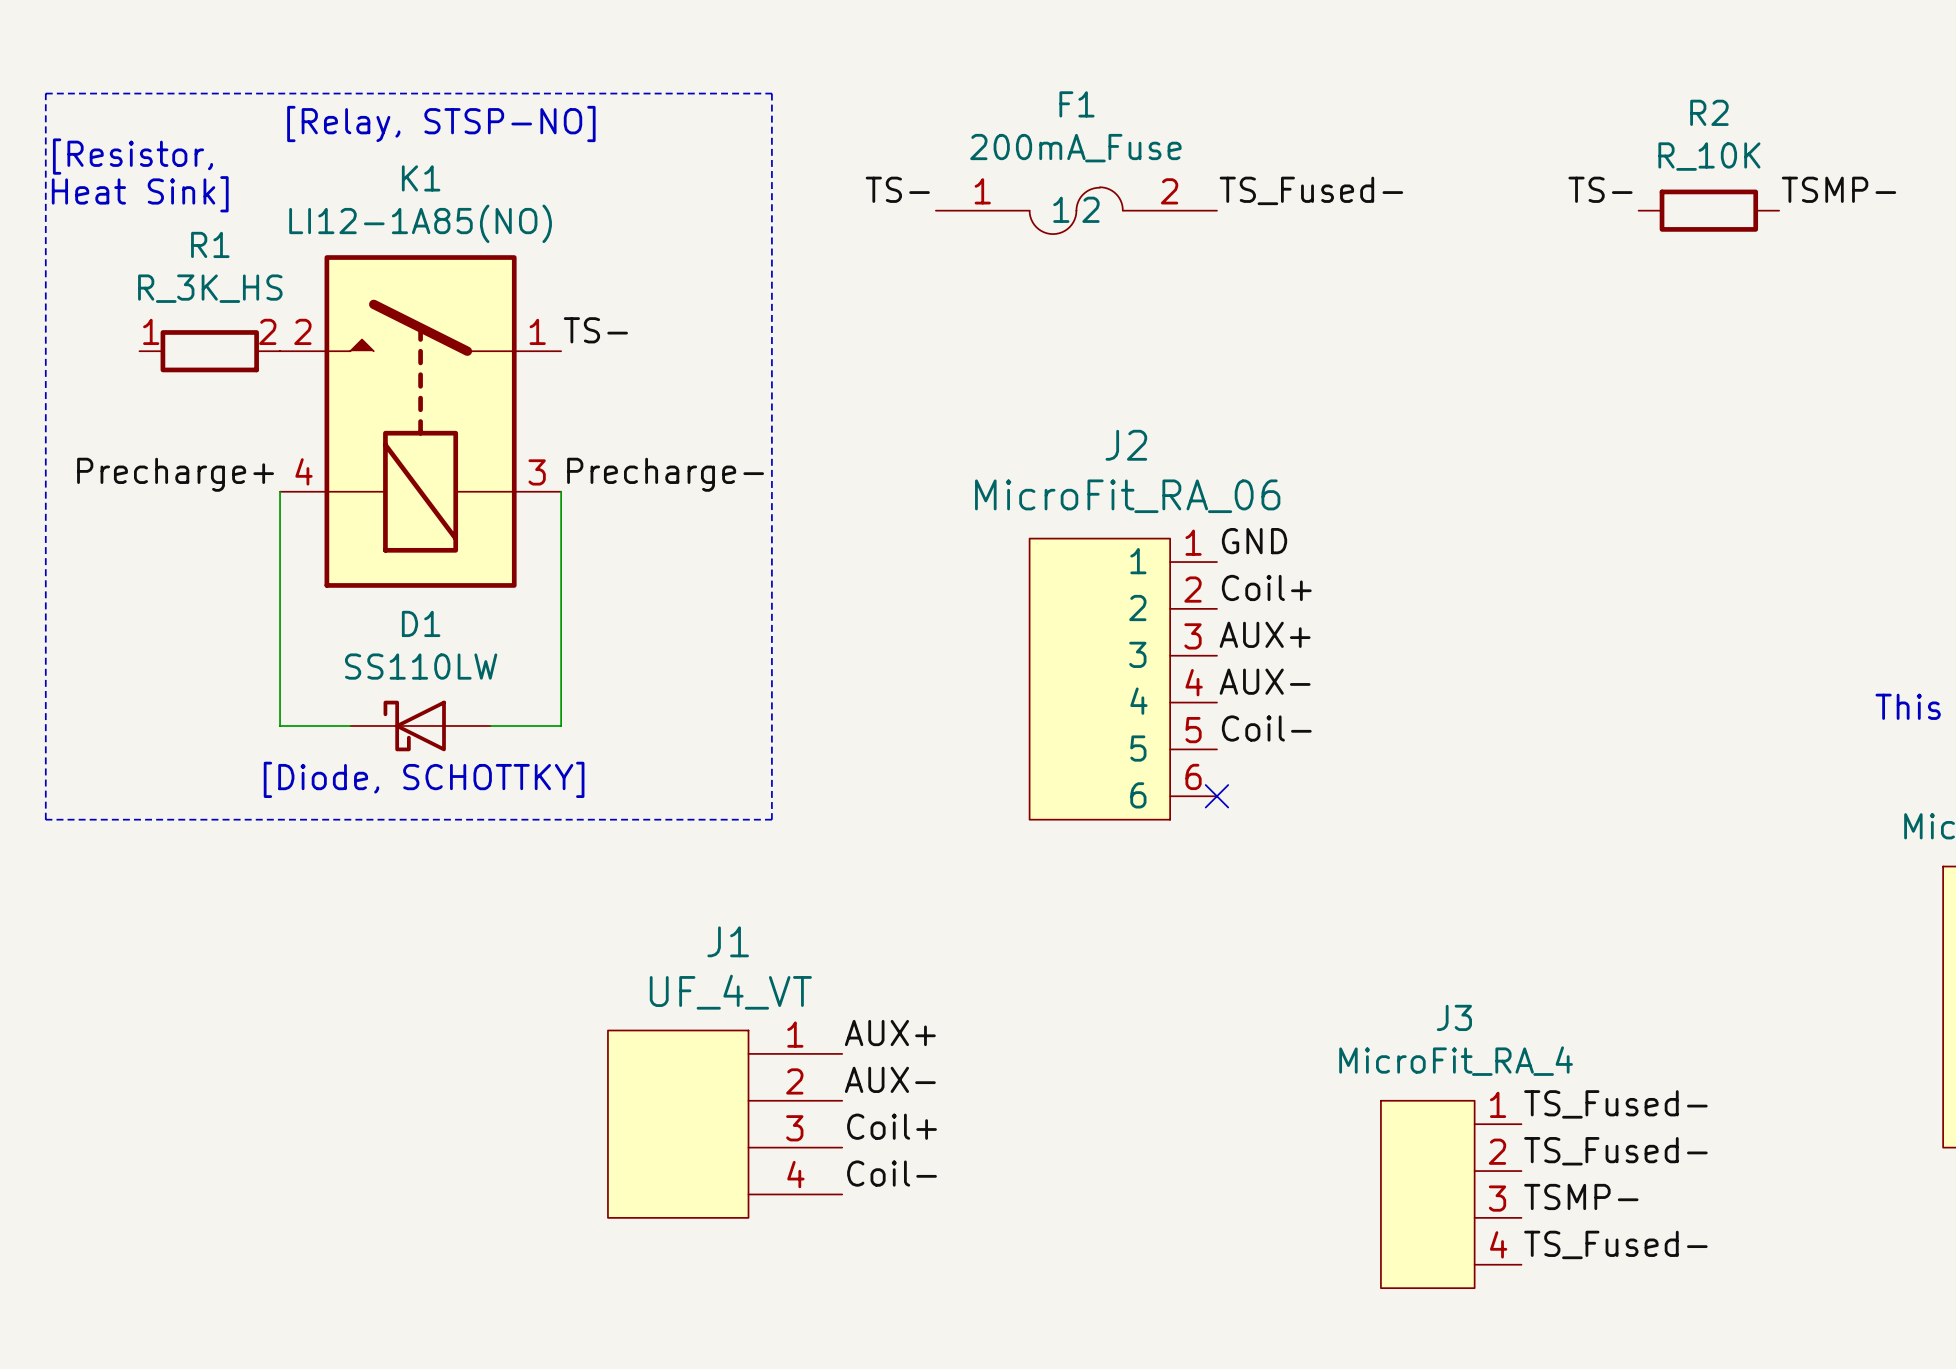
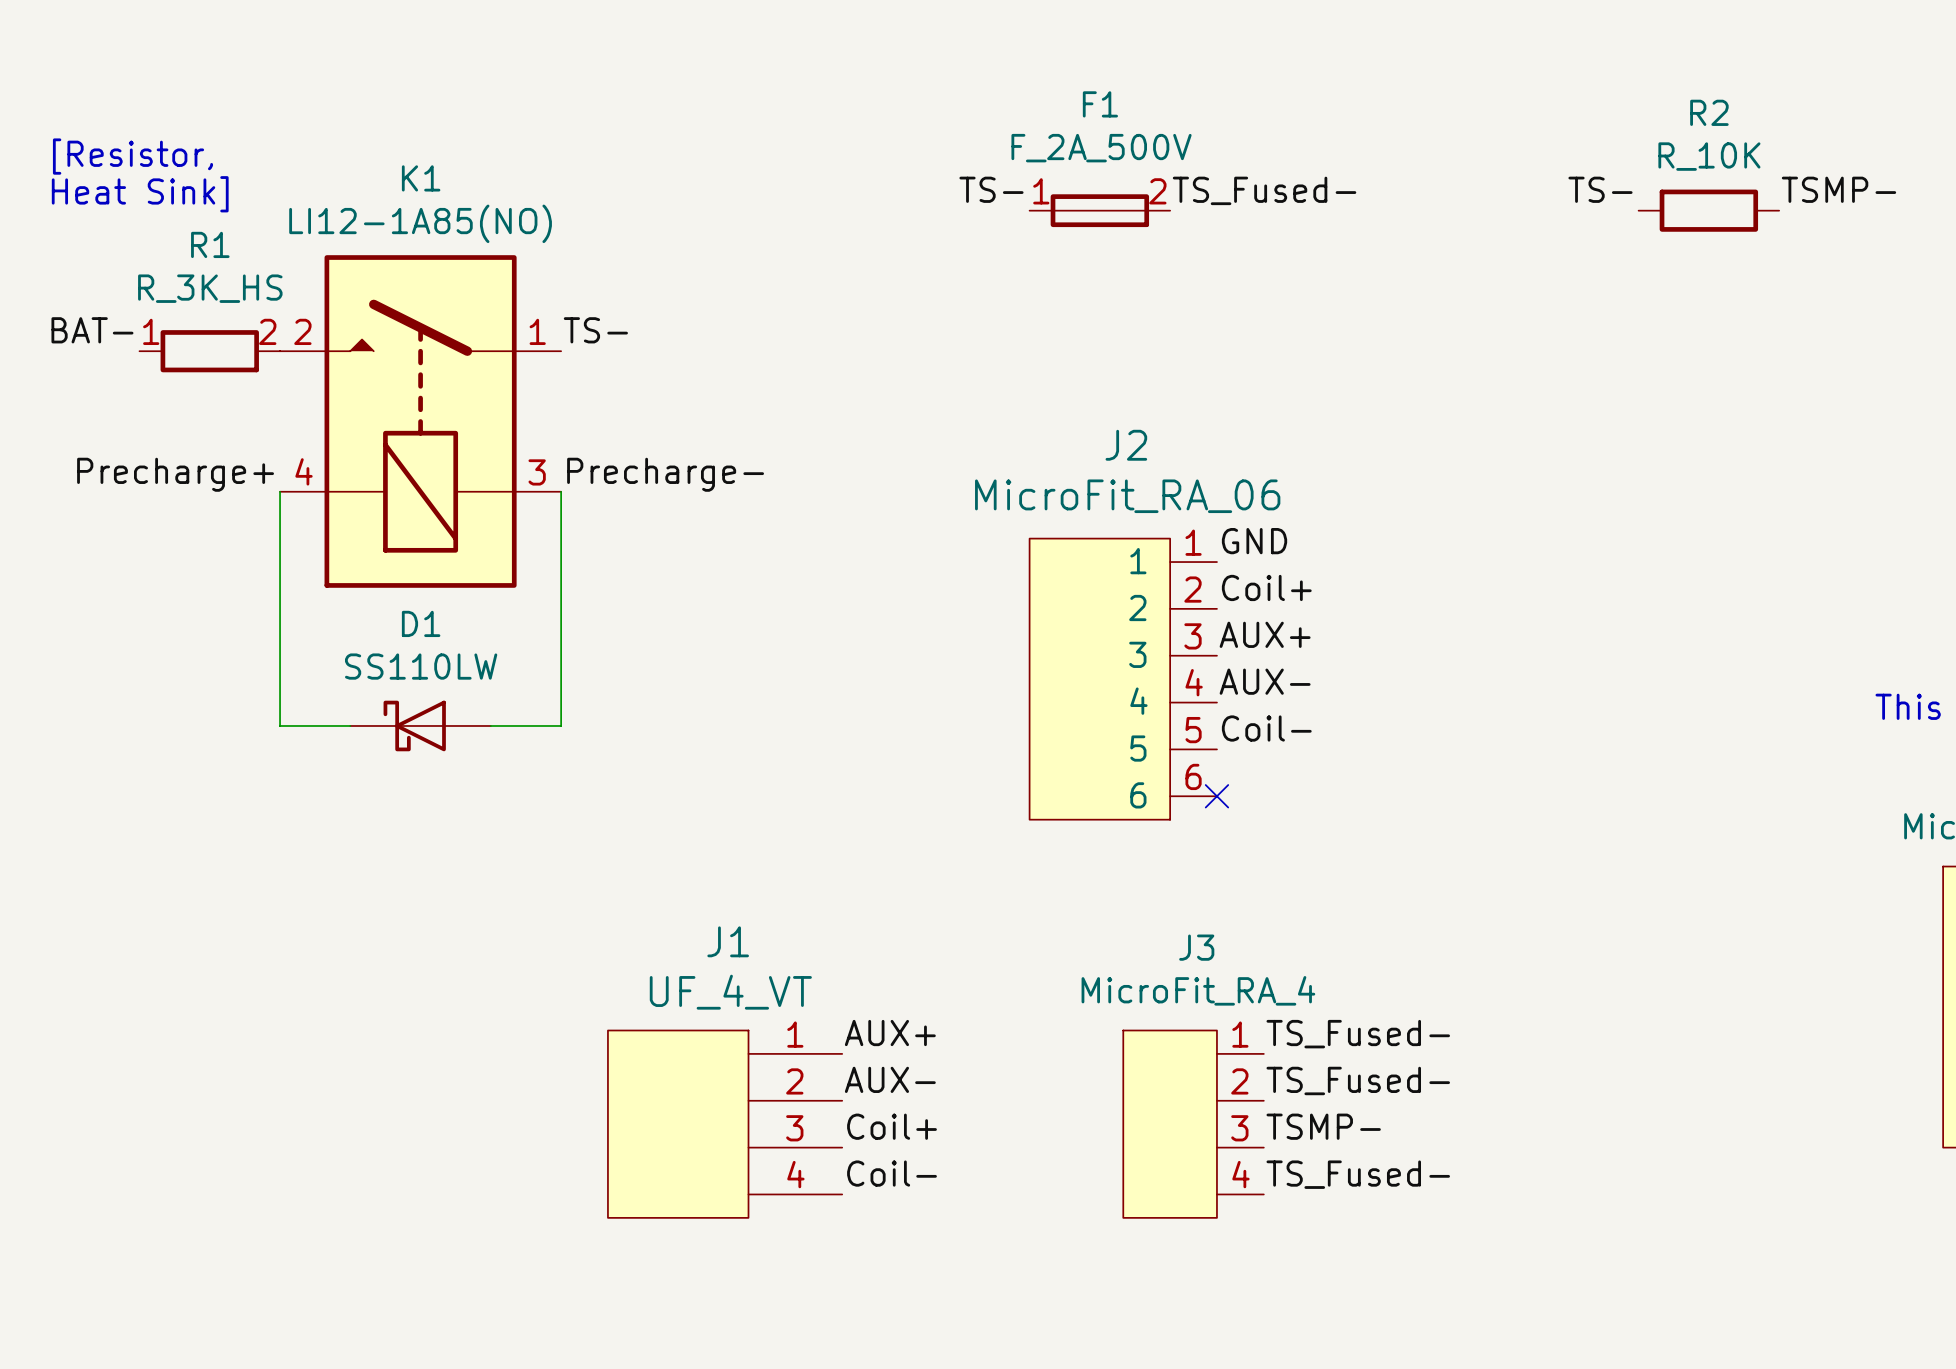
line: (45, 93) (45, 819) (771, 819) (771, 93) (45, 93) -> none
text: [Relay, STSP-NO] (441, 124) -> none
F1 value: 200mA_Fuse (1075, 148) -> F_2A_500V (1101, 148)
F1 symbol: [935, 187, 1217, 235] -> [1029, 194, 1171, 228]
label position: TS- (897, 189) -> TS- (991, 189)
label position: TS_Fused- (1311, 190) -> TS_Fused- (1264, 190)
label: none -> BAT- (92, 330)
text: [Diode, SCHOTTKY] (424, 779) -> none
label: none -> TS_Fused- (1358, 1034)
label: none -> TS_Fused- (1358, 1080)
label: TS_Fused- (1615, 1104) -> none
label: TS_Fused- (1615, 1151) -> none
label: none -> TS_Fused- (1358, 1174)
J3 position: (1451, 1194) -> (1193, 1124)
label position: TSMP- (1581, 1196) -> TSMP- (1323, 1126)
label: TS_Fused- (1615, 1244) -> none

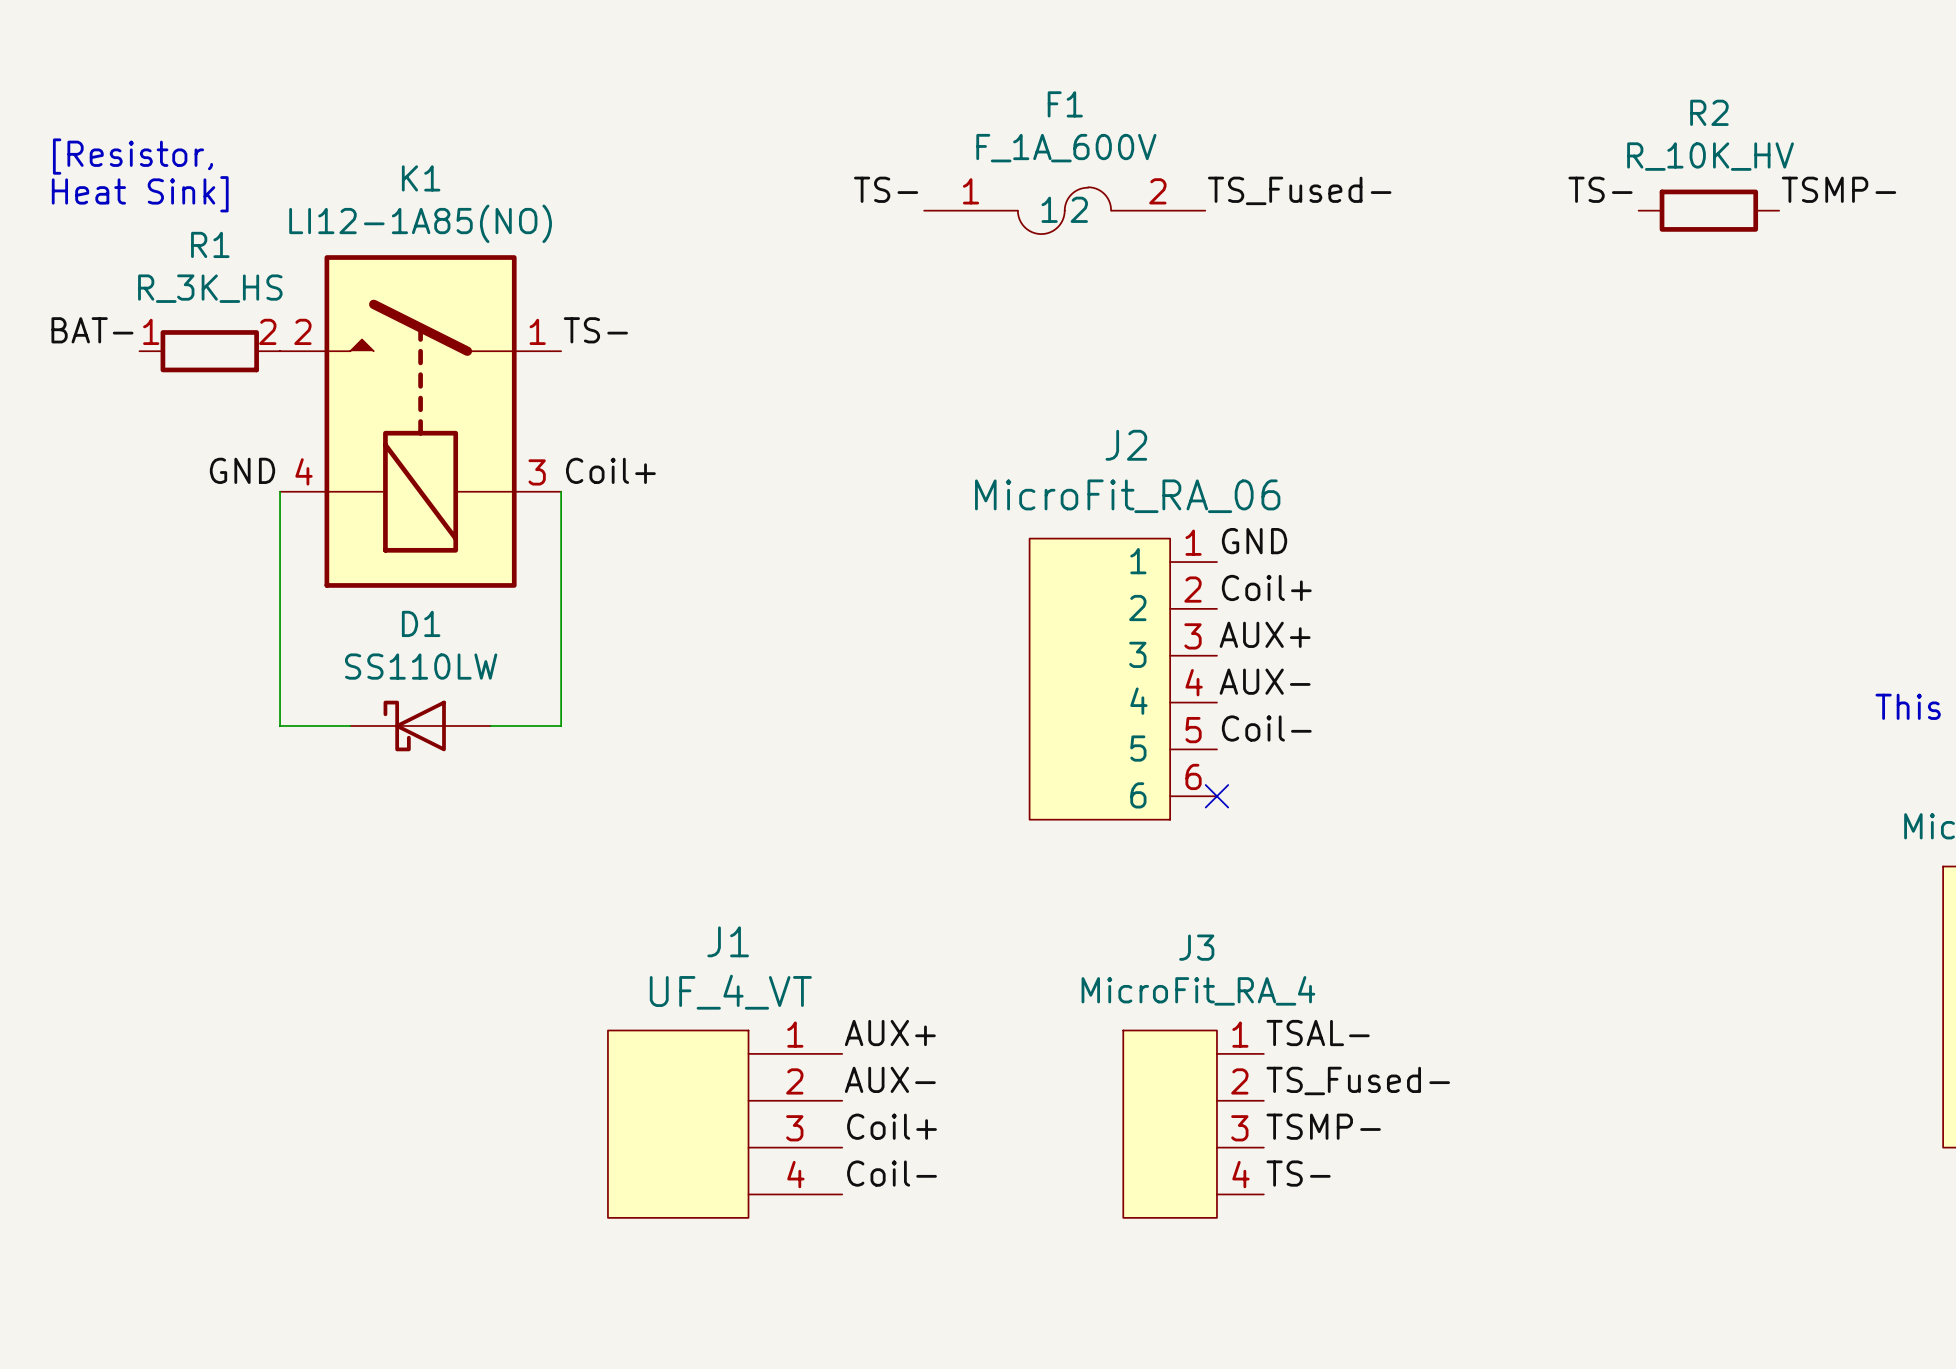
F1 value: F_2A_500V (1101, 148) -> F_1A_600V (1066, 148)
R2 value: R_10K (1709, 156) -> R_10K_HV (1710, 156)
label position: TS- (991, 189) -> TS- (886, 189)
label position: TS_Fused- (1264, 190) -> TS_Fused- (1299, 190)
F1 symbol: [1029, 194, 1171, 228] -> [924, 187, 1206, 235]
label: Precharge+ (175, 474) -> GND (242, 470)
label: Precharge- (665, 474) -> Coil+ (610, 470)
label: TS_Fused- (1358, 1034) -> TSAL- (1318, 1033)
label: TS_Fused- (1358, 1174) -> TS- (1298, 1173)

